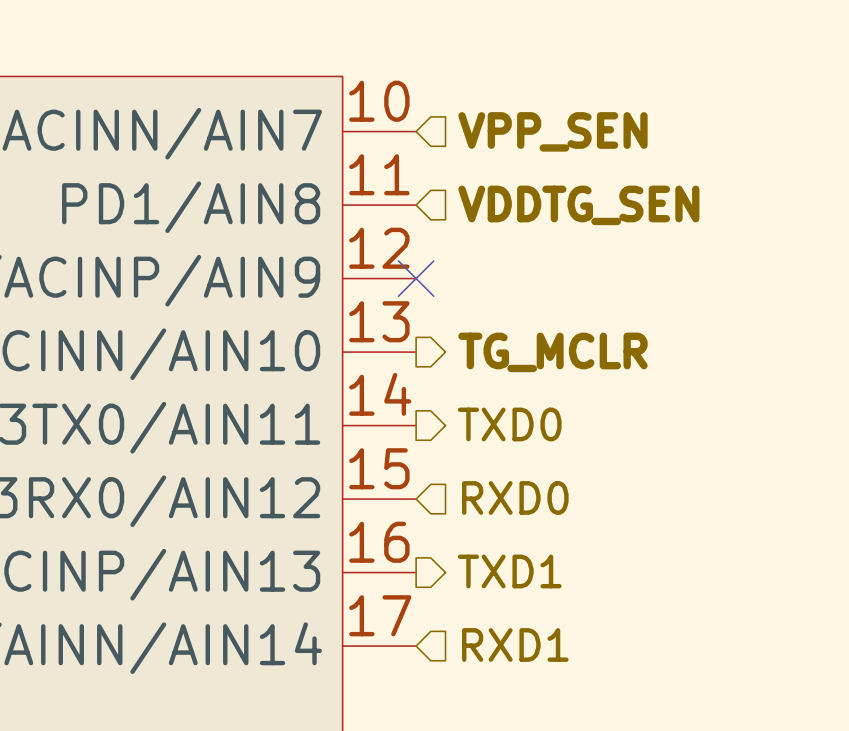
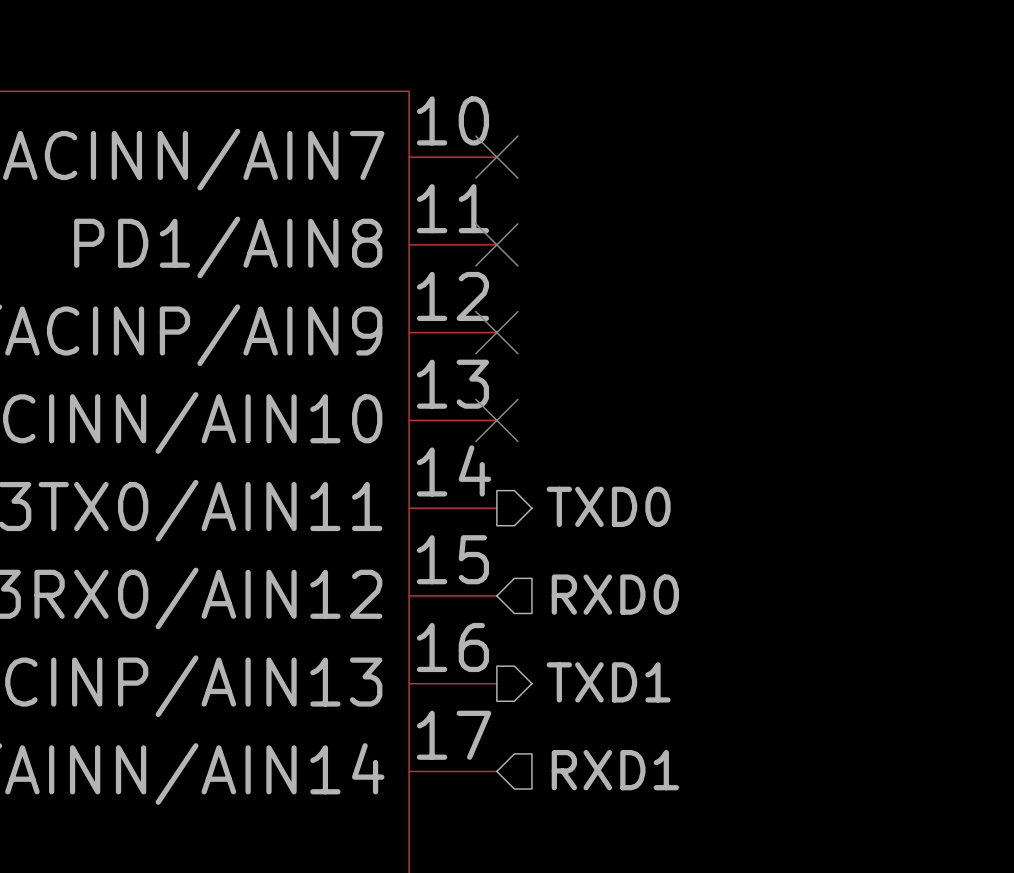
no-connect mark: none -> (496, 157)
hierarchical label: VPP_SEN (552, 131) -> none
no-connect mark: none -> (496, 244)
hierarchical label: VDDTG_SEN (578, 205) -> none
no-connect mark: none -> (496, 420)
hierarchical label: TG_MCLR (552, 352) -> none

